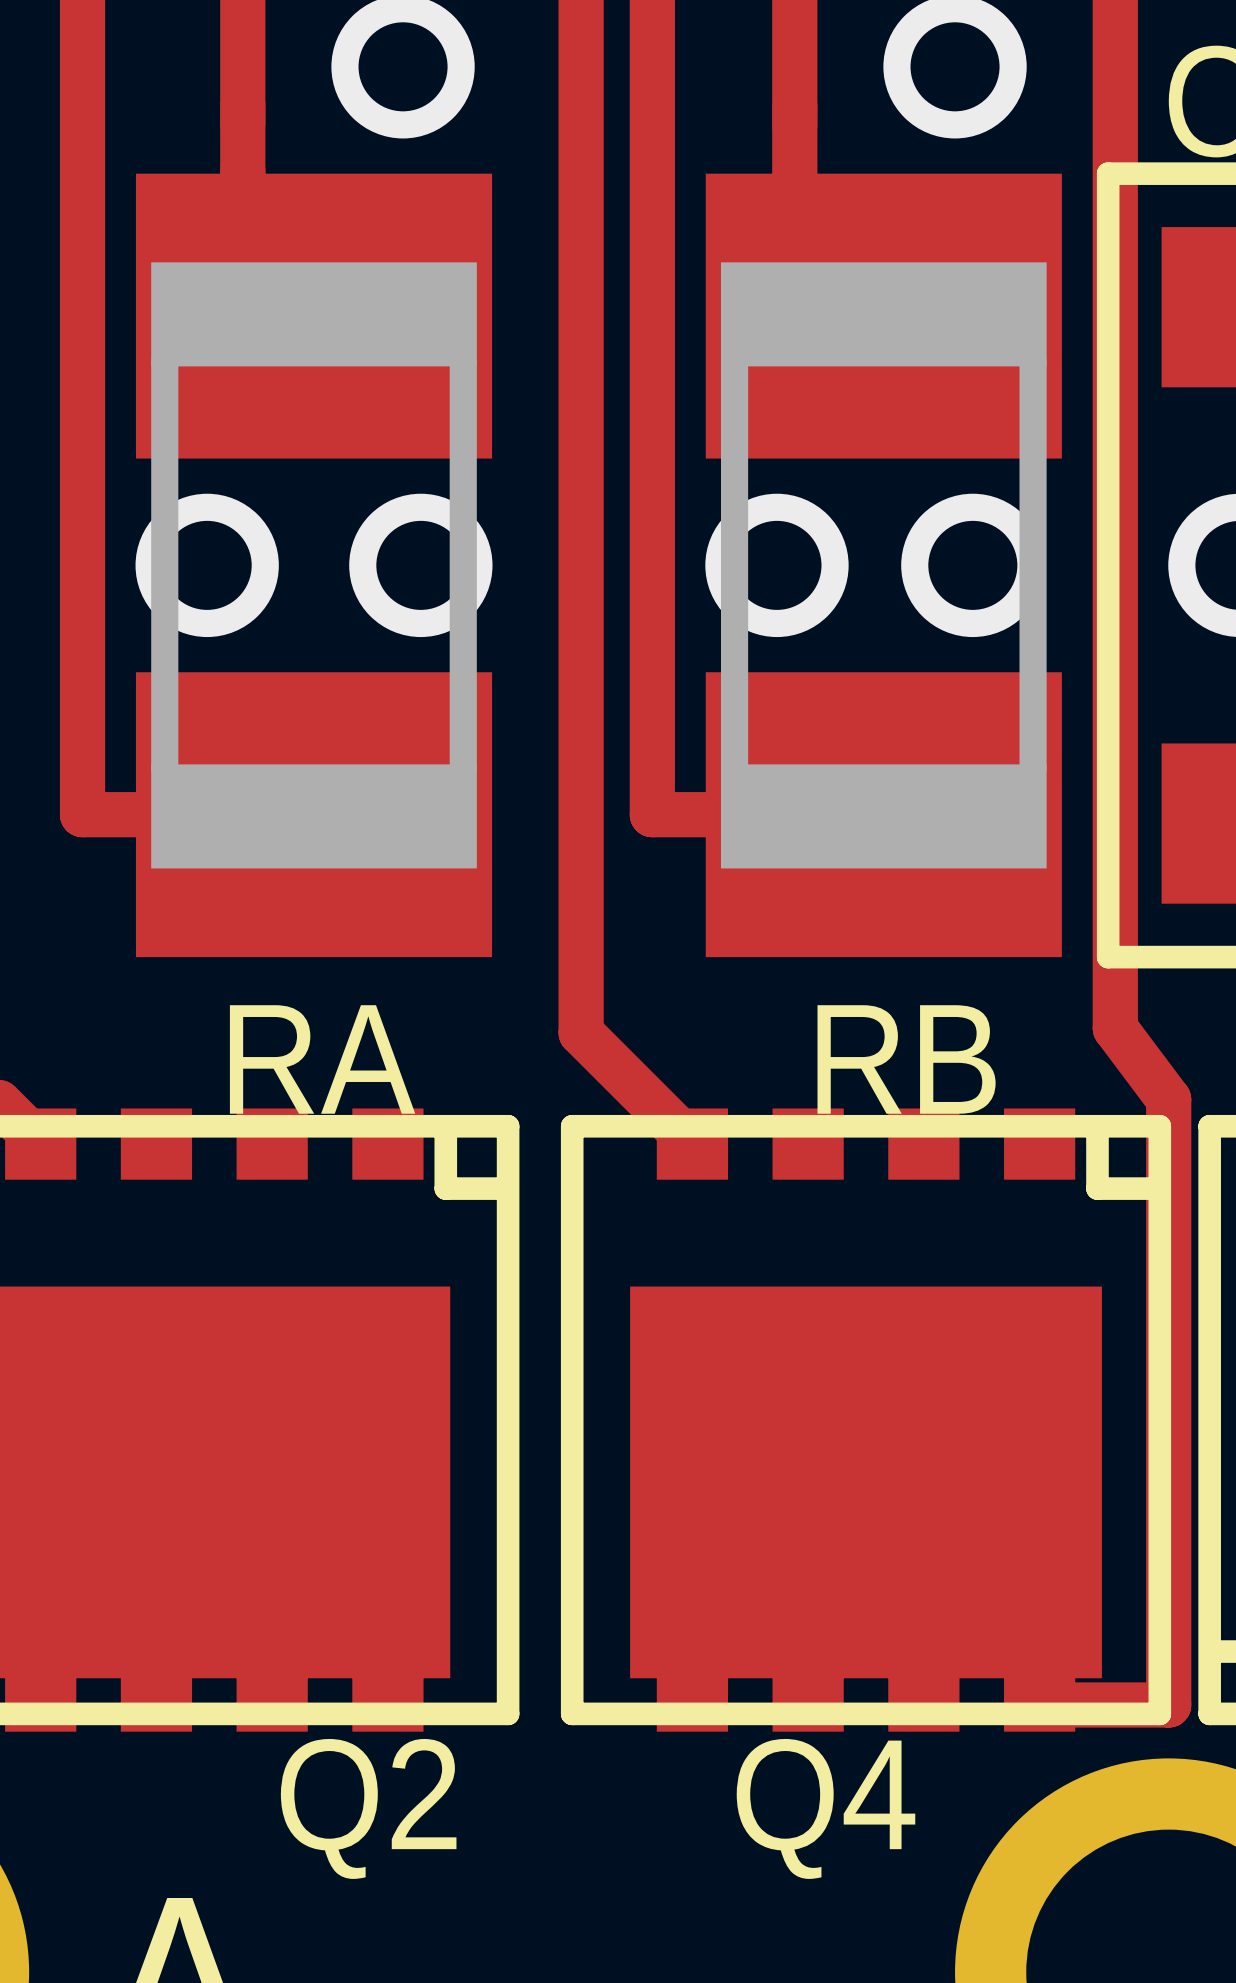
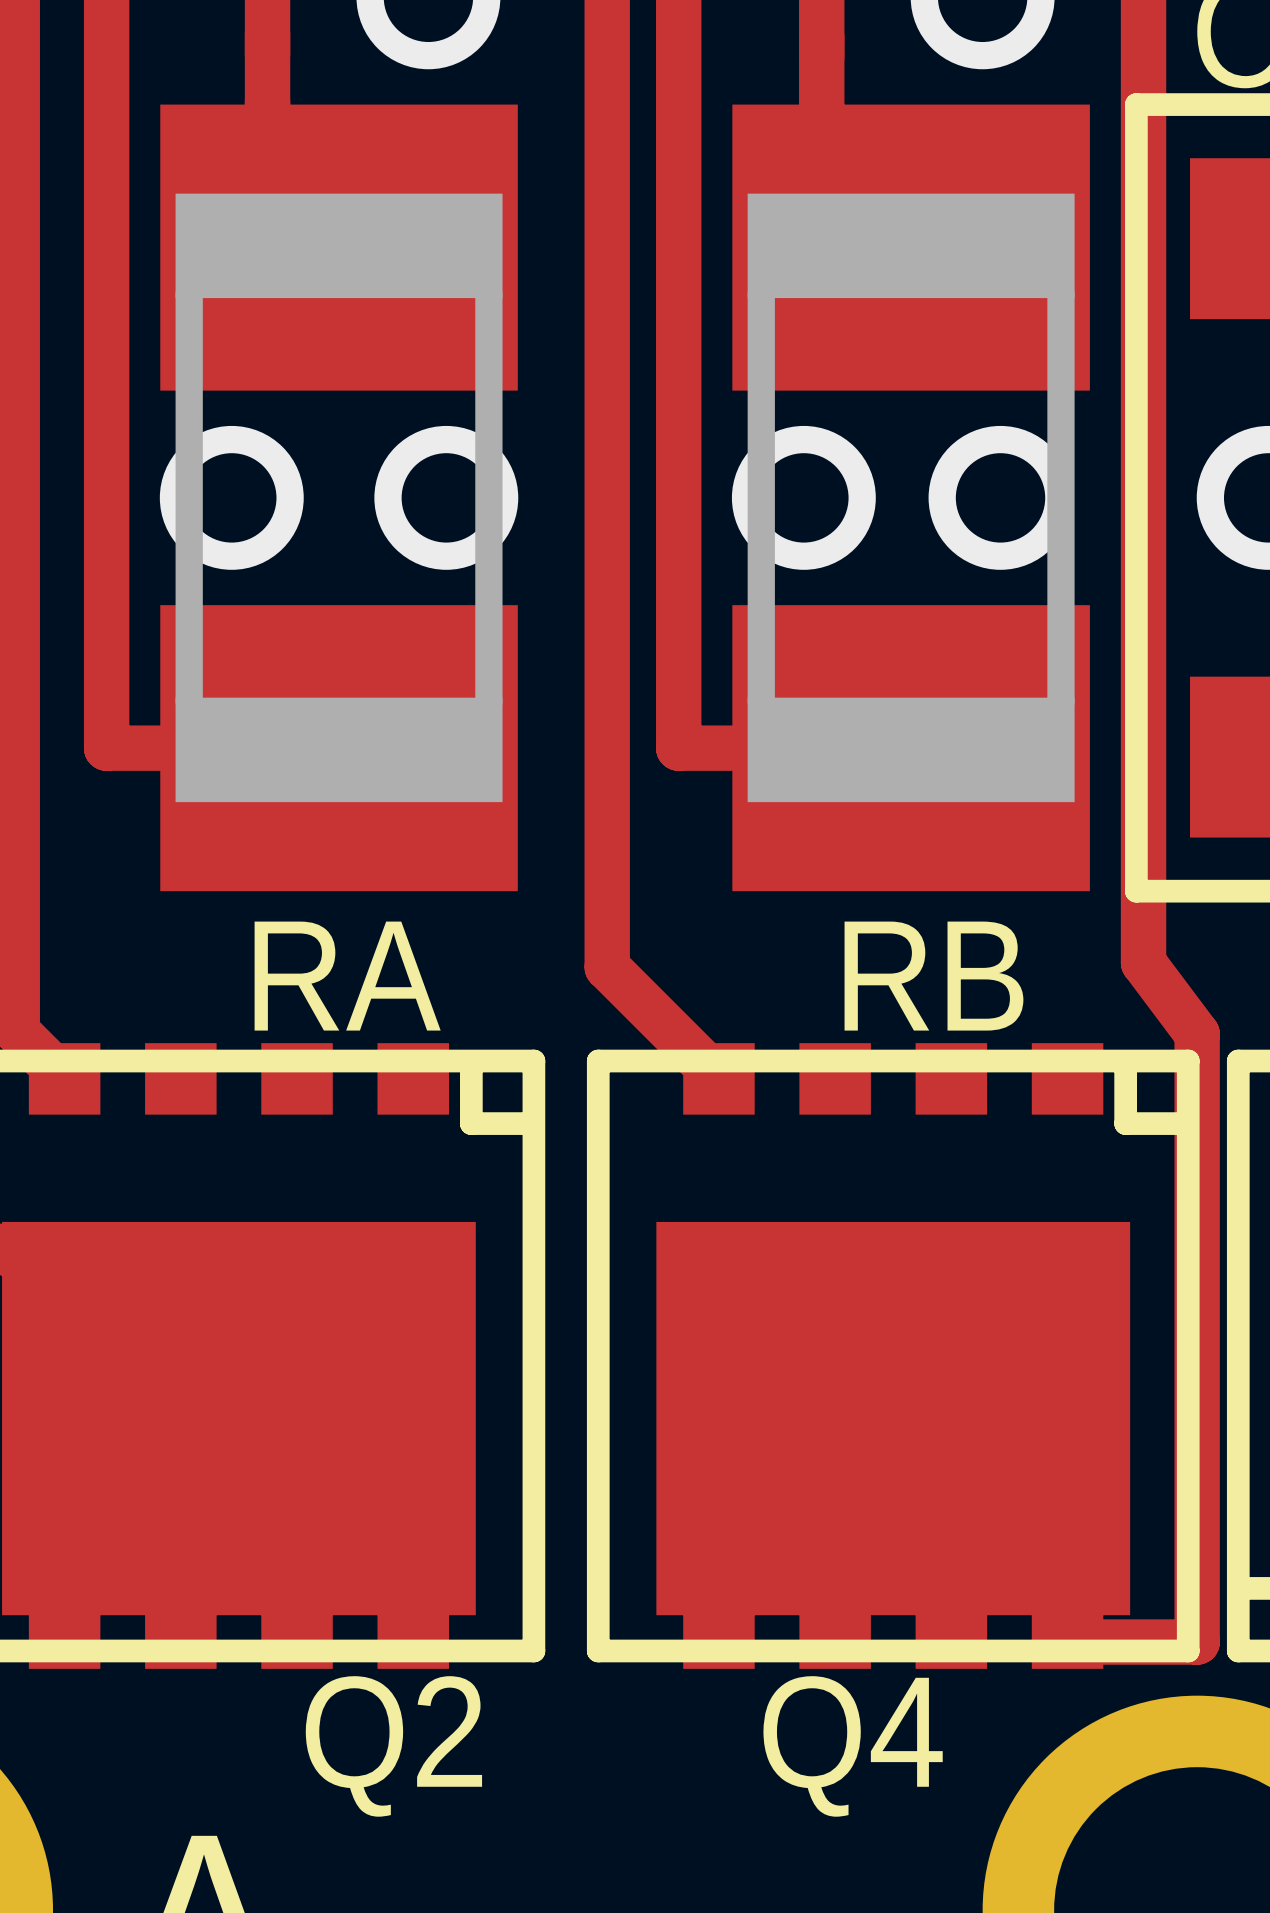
RA name position: RA (322, 1059) -> RA (347, 976)
RB name position: RB (906, 1059) -> RB (933, 976)

